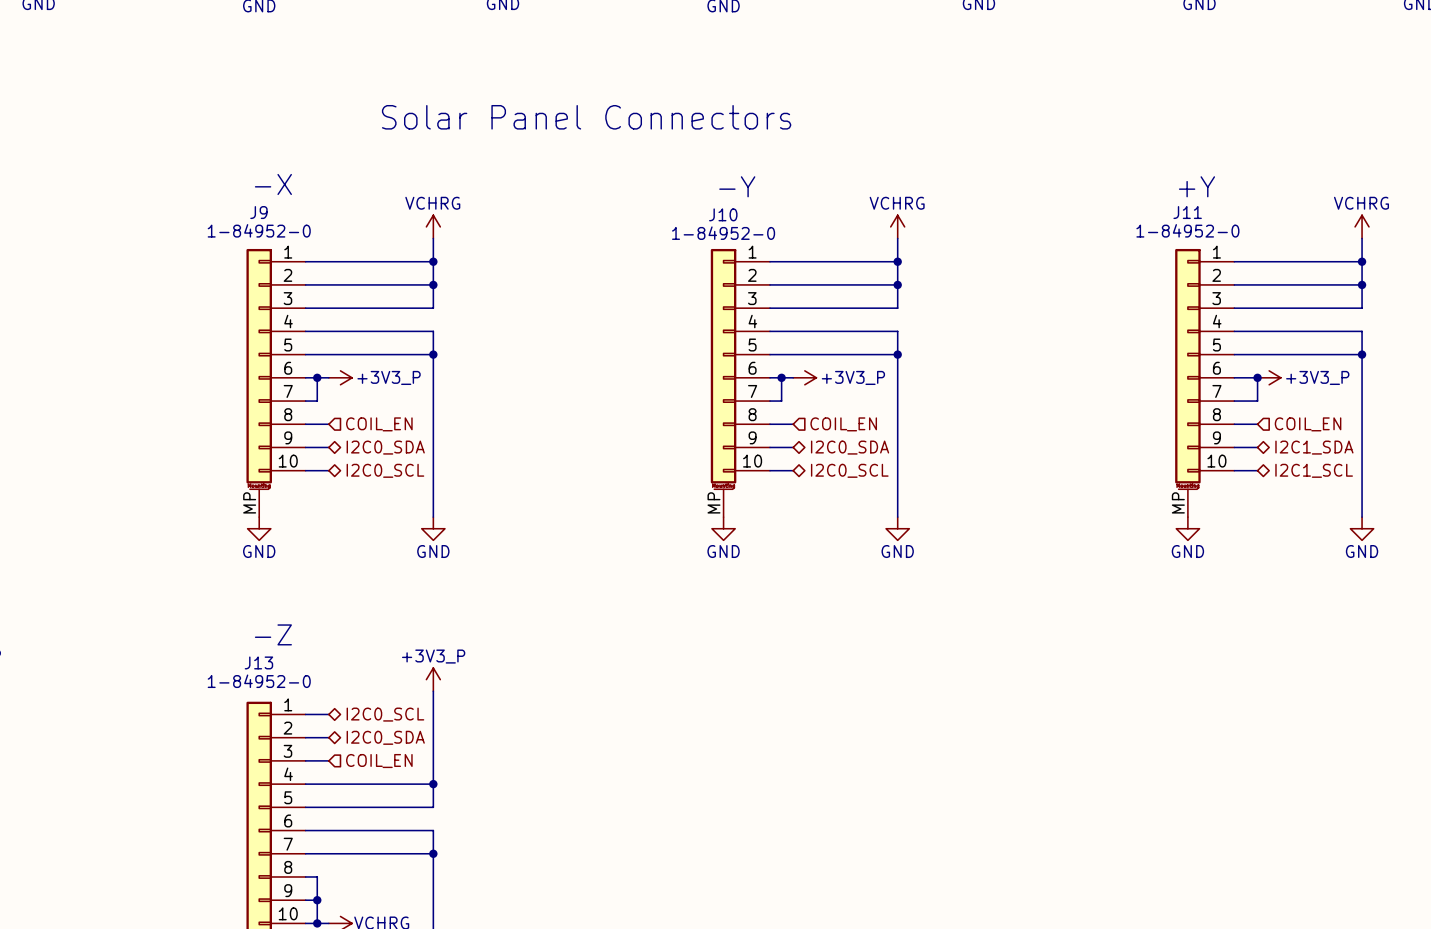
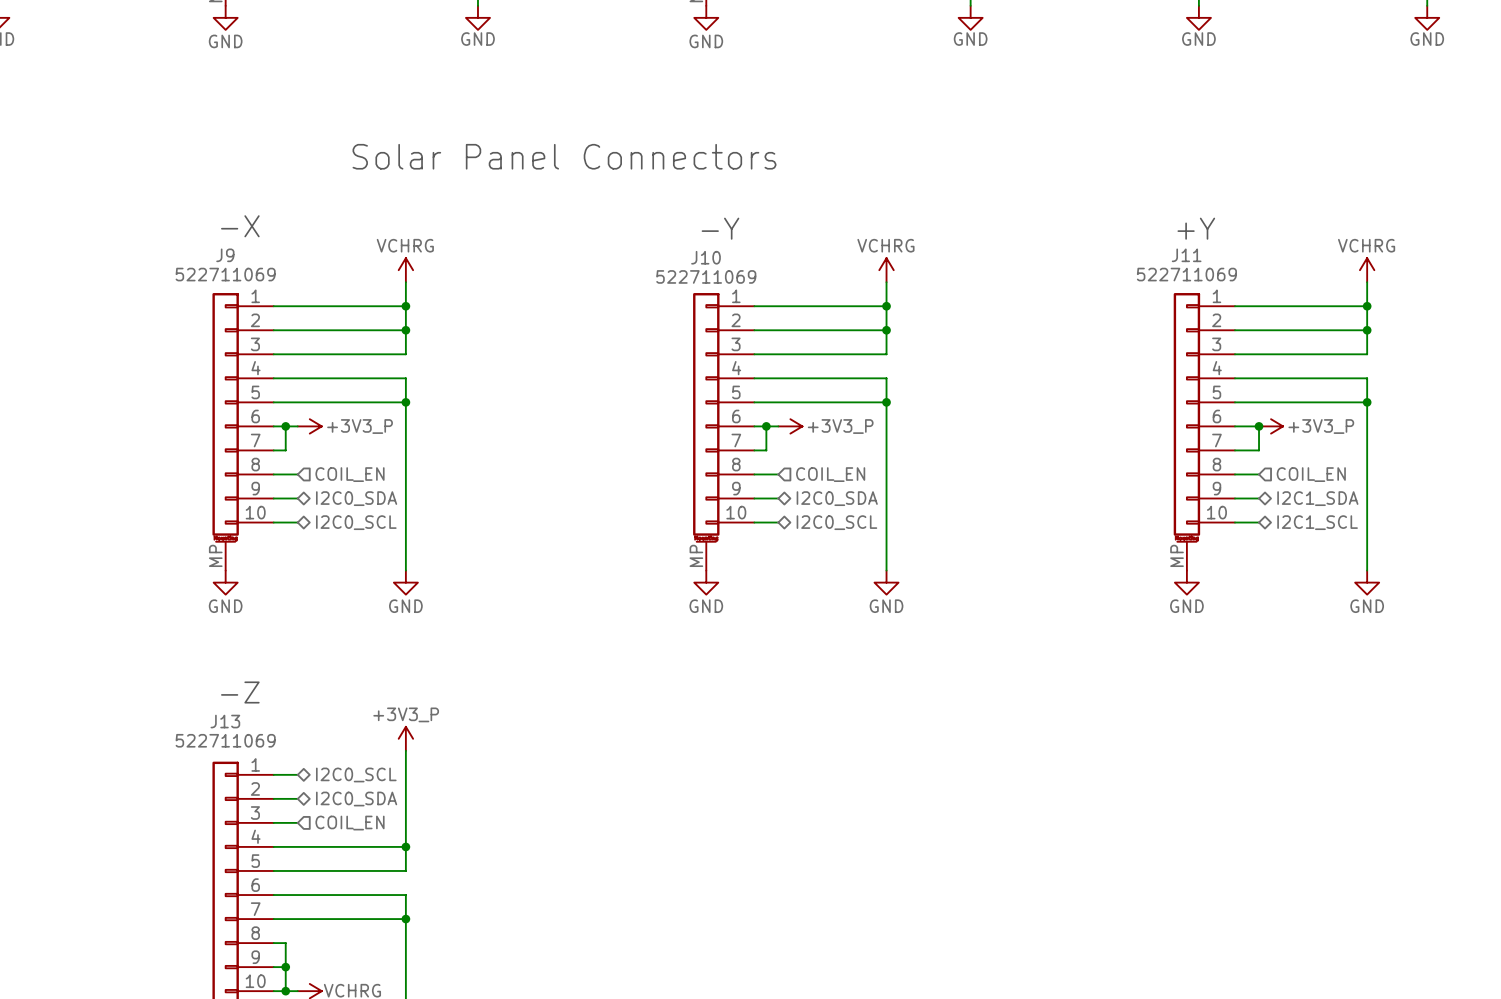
J9 value: 1-84952-0 (259, 230) -> 522711069 (225, 274)
J11 value: 1-84952-0 (1187, 230) -> 522711069 (1186, 274)
J10 value: 1-84952-0 (723, 233) -> 522711069 (706, 276)
J13 value: 1-84952-0 (259, 681) -> 522711069 (225, 740)

